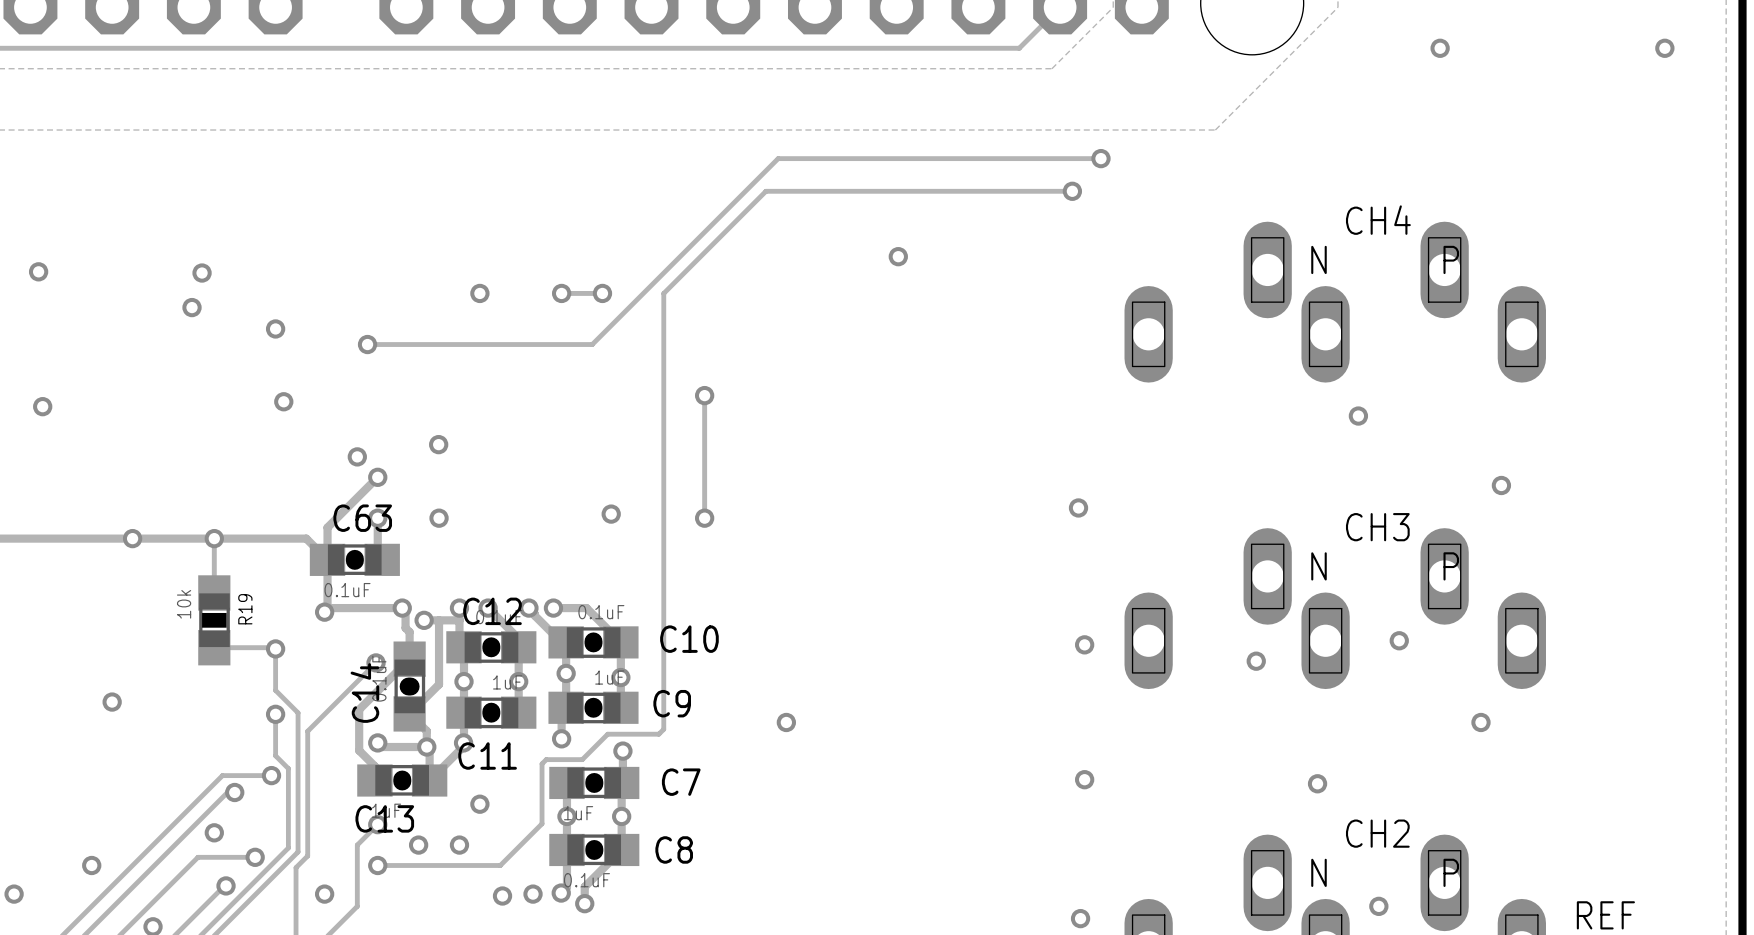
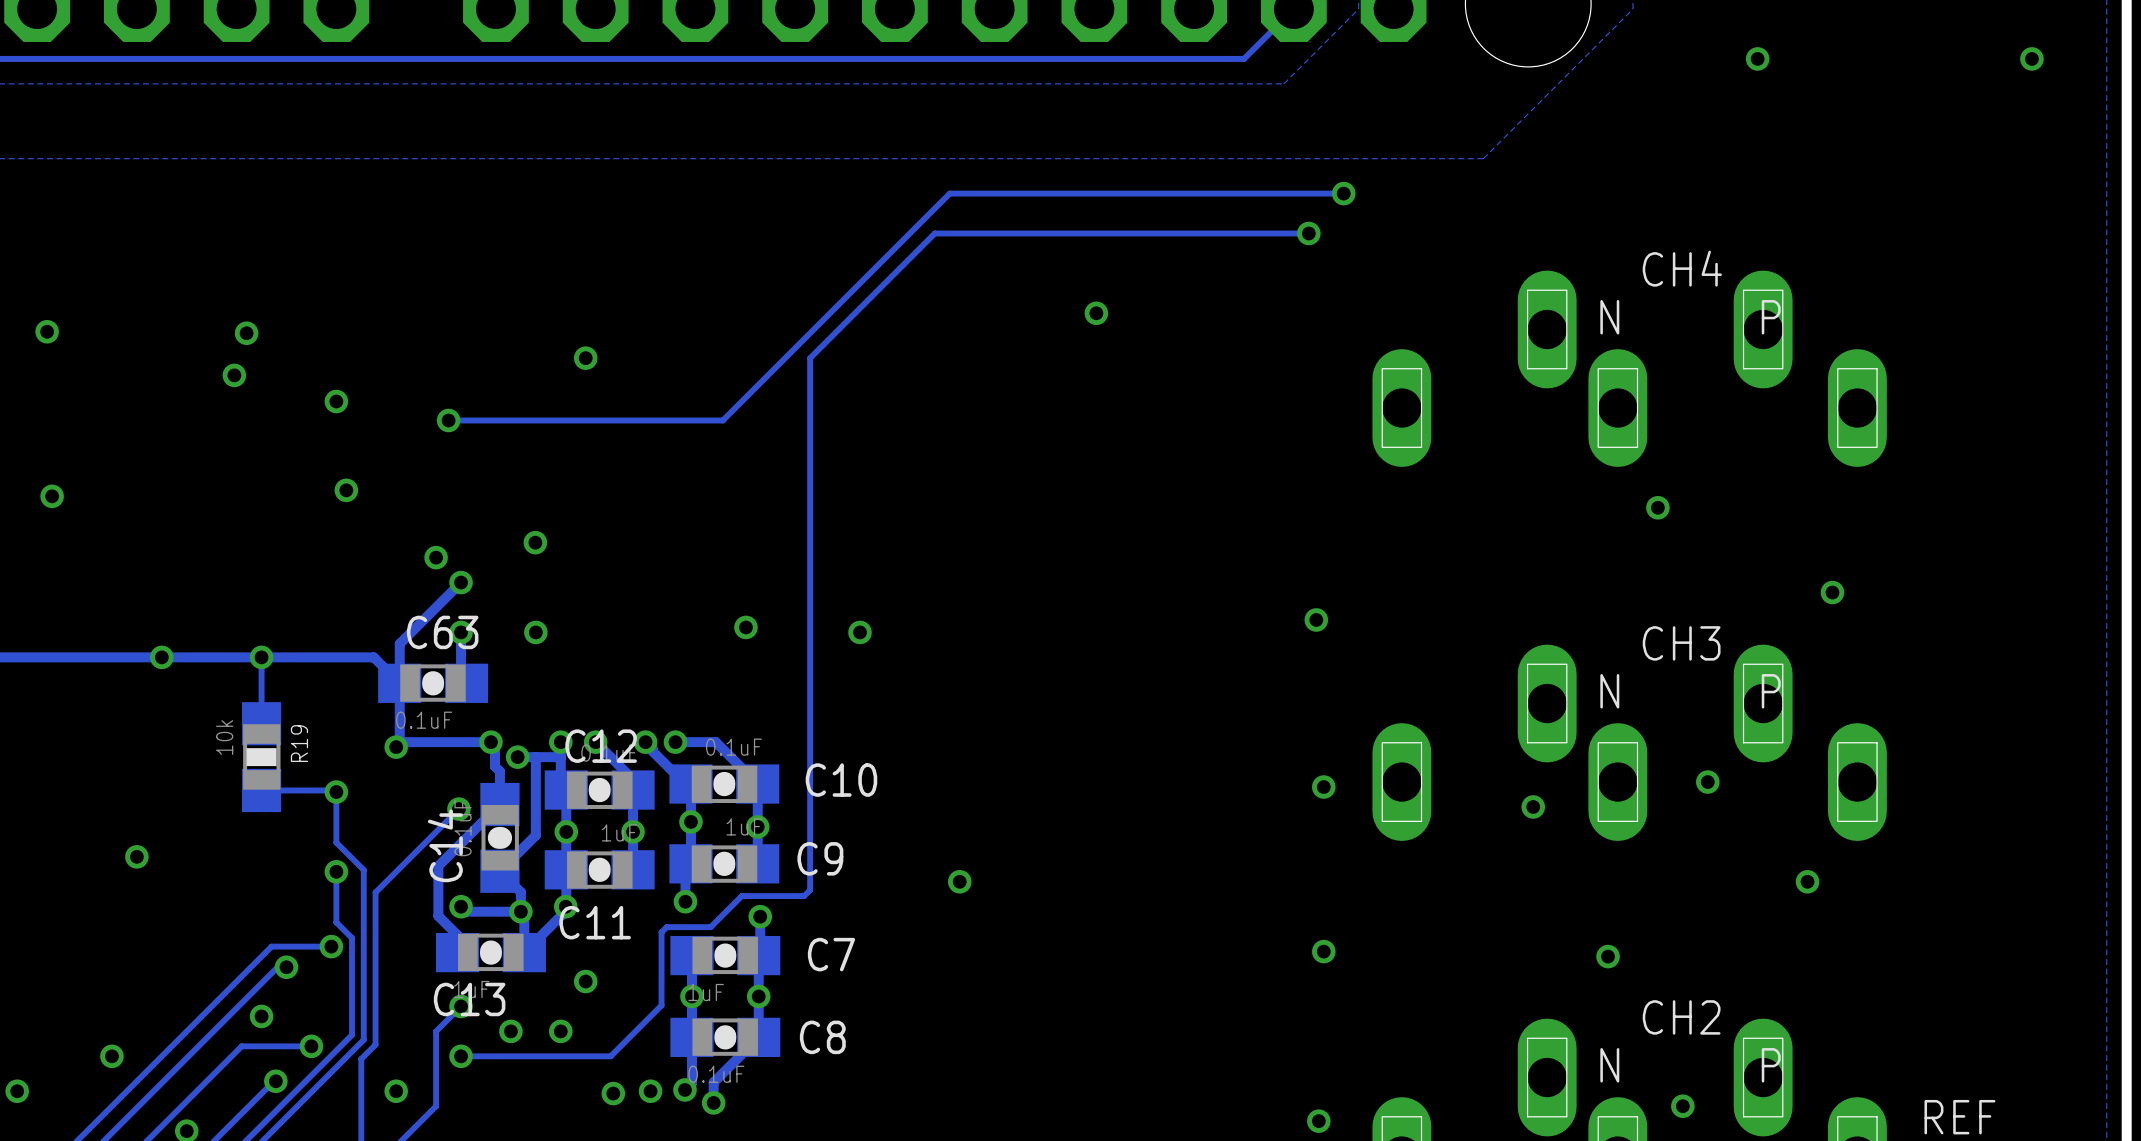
via: (561, 293) -> none
track: (602, 293) (561, 293) -> none
via: (602, 293) -> none
track: (704, 395) (704, 518) -> none
via: (704, 395) -> none

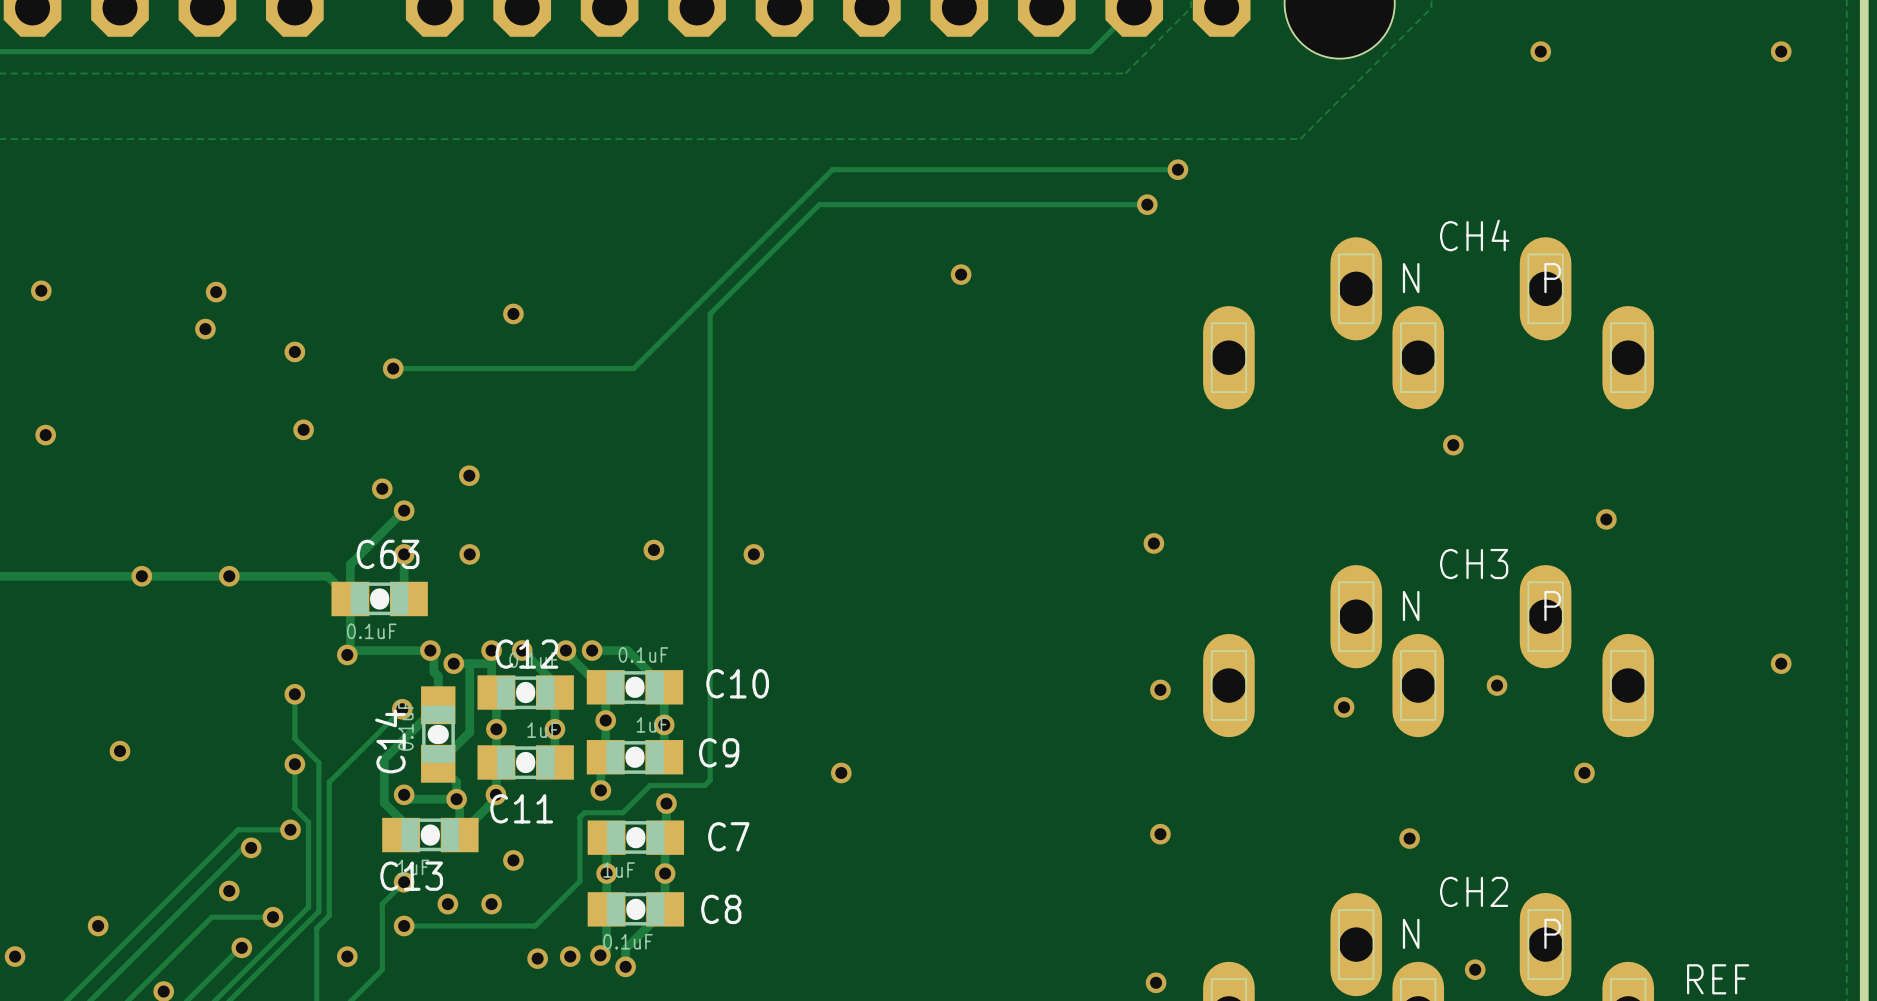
track: (261, 657) (261, 723) -> none
R19: 10k (261, 757) -> none
via: none -> (1781, 663)
track: (261, 790) (336, 792) -> none

